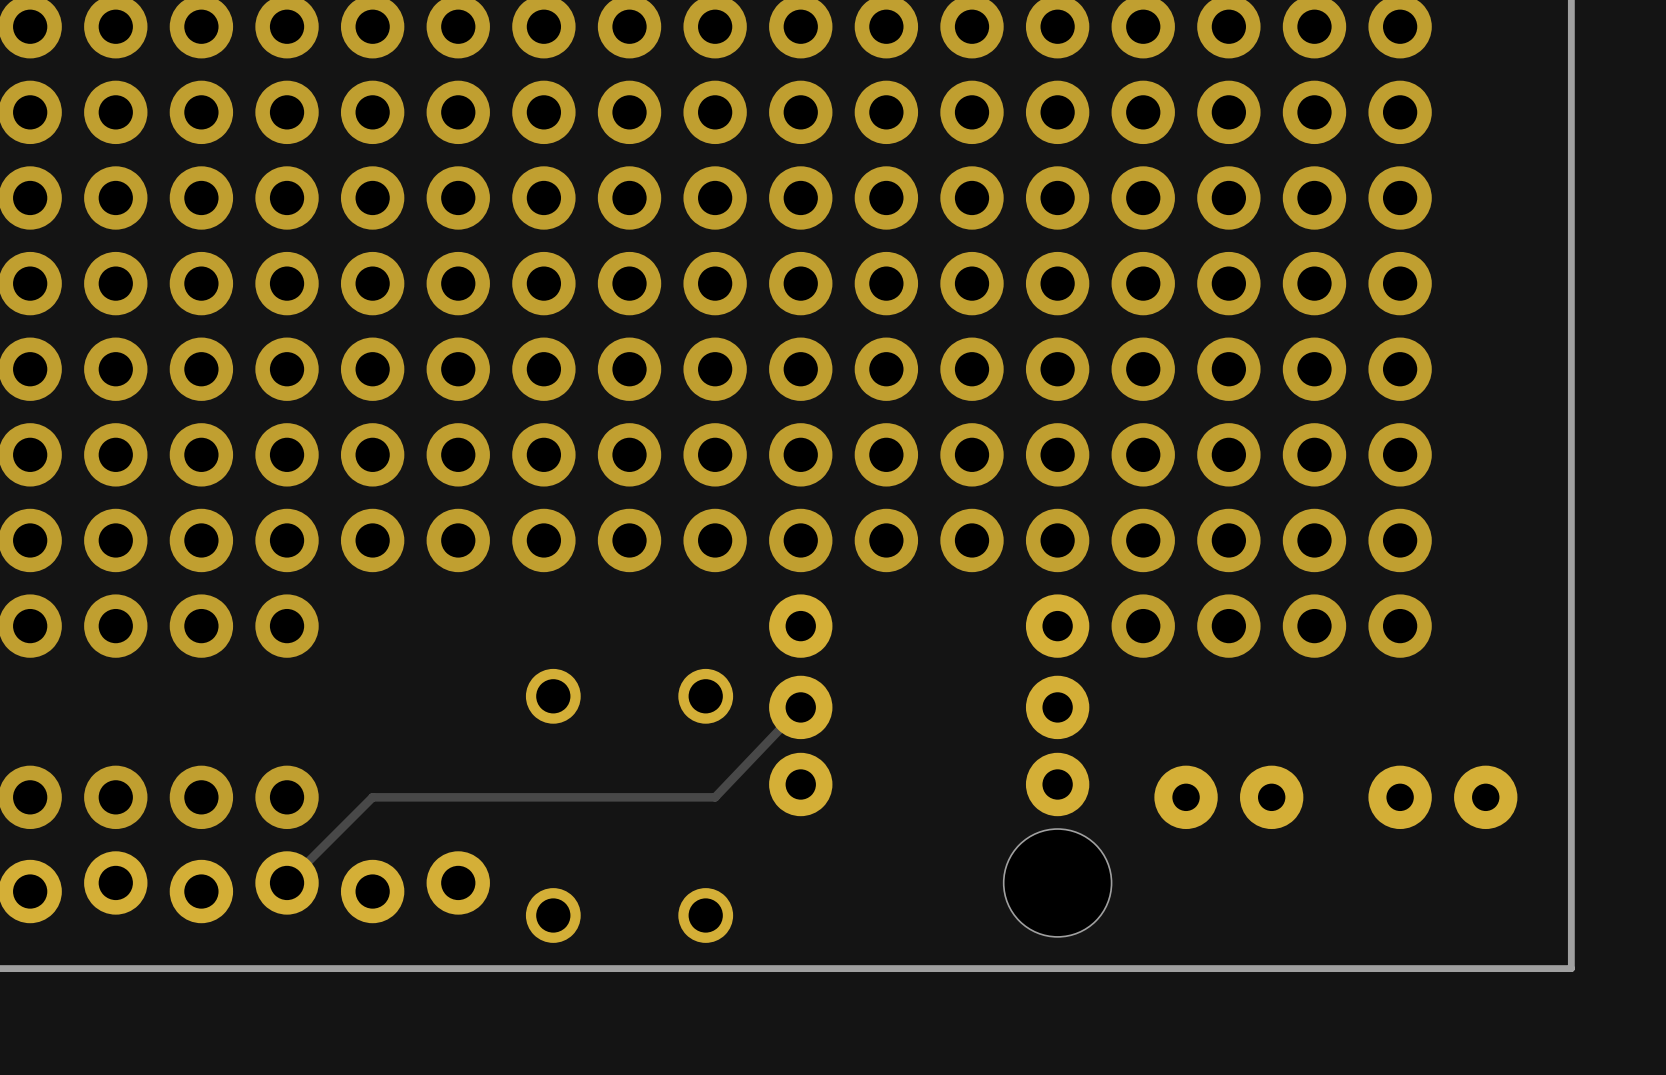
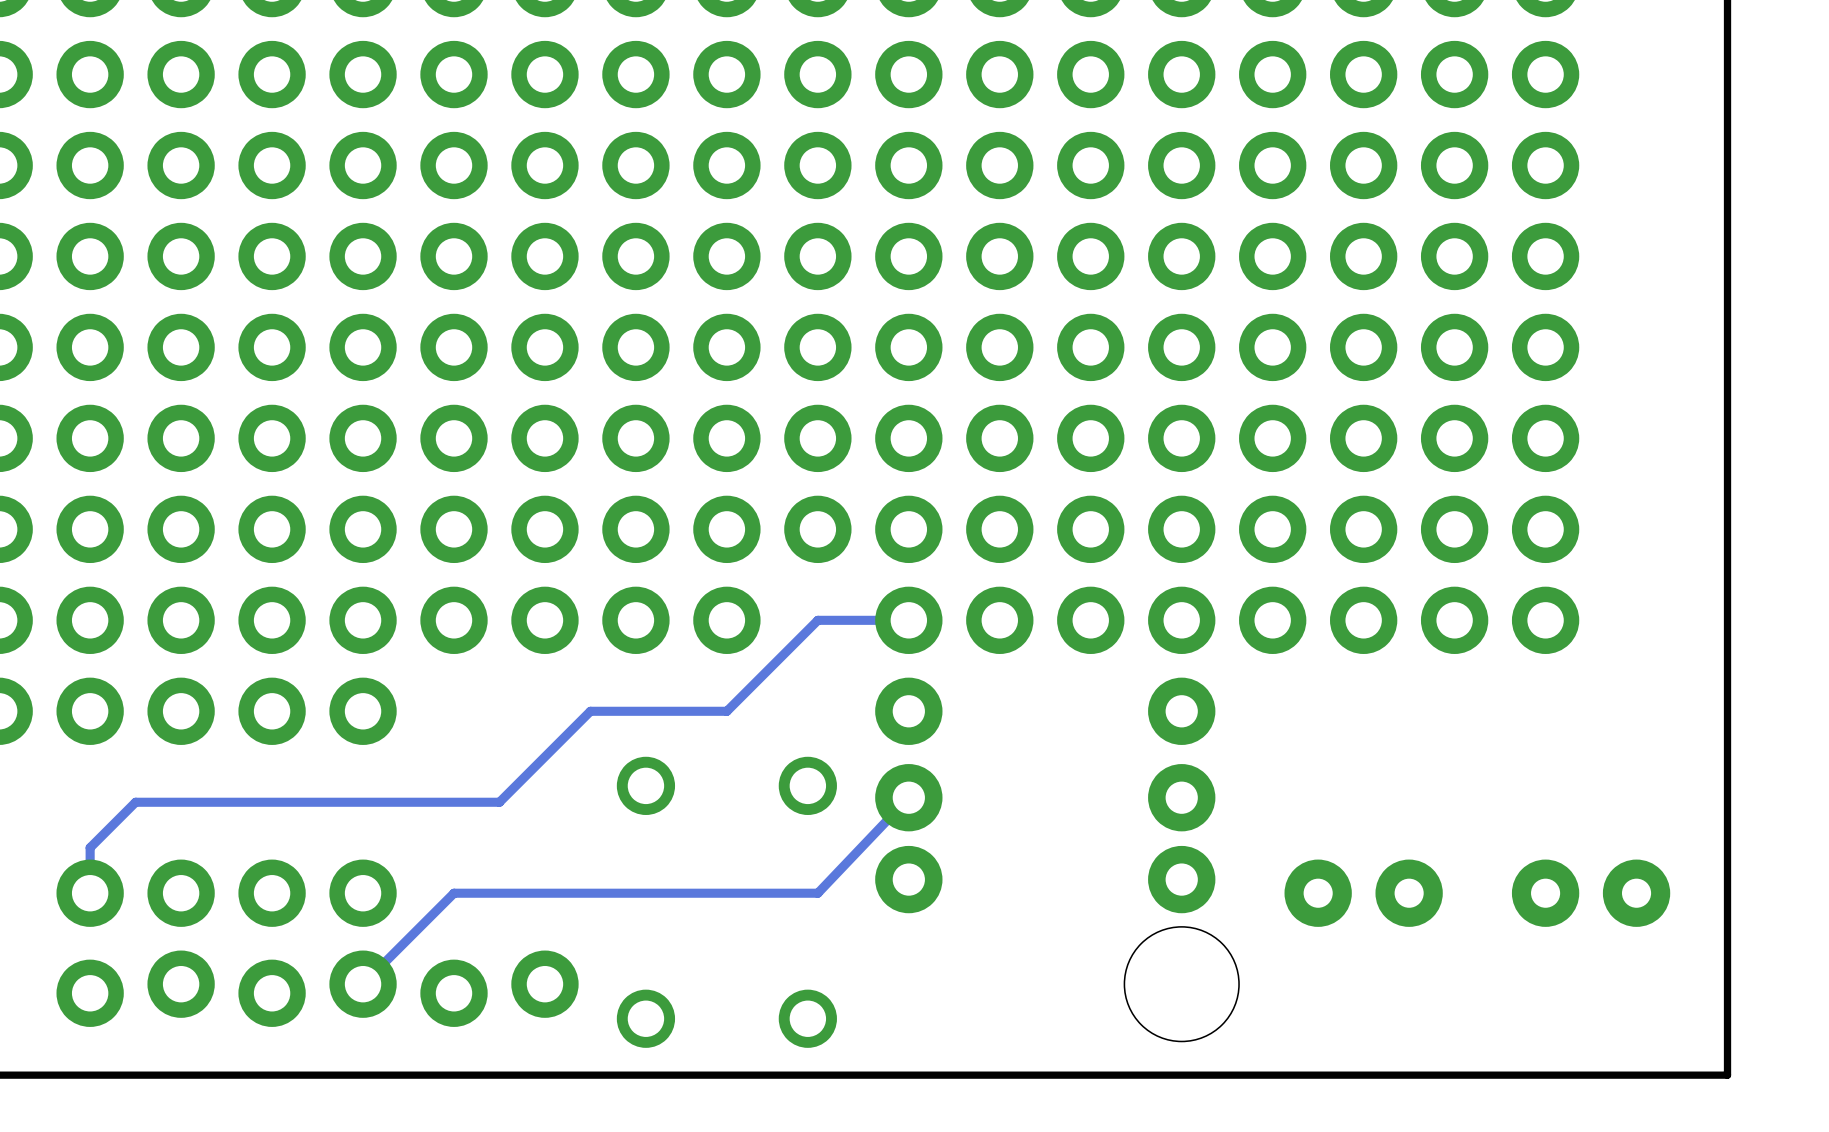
via: (715, 540) -> none
track: none -> (908, 620) (817, 620) (726, 711) (590, 711) (499, 802) (135, 802) (90, 847) (90, 893)
via: (1143, 626) -> none
via: (1228, 626) -> none
via: (1314, 626) -> none
via: (1400, 626) -> none

